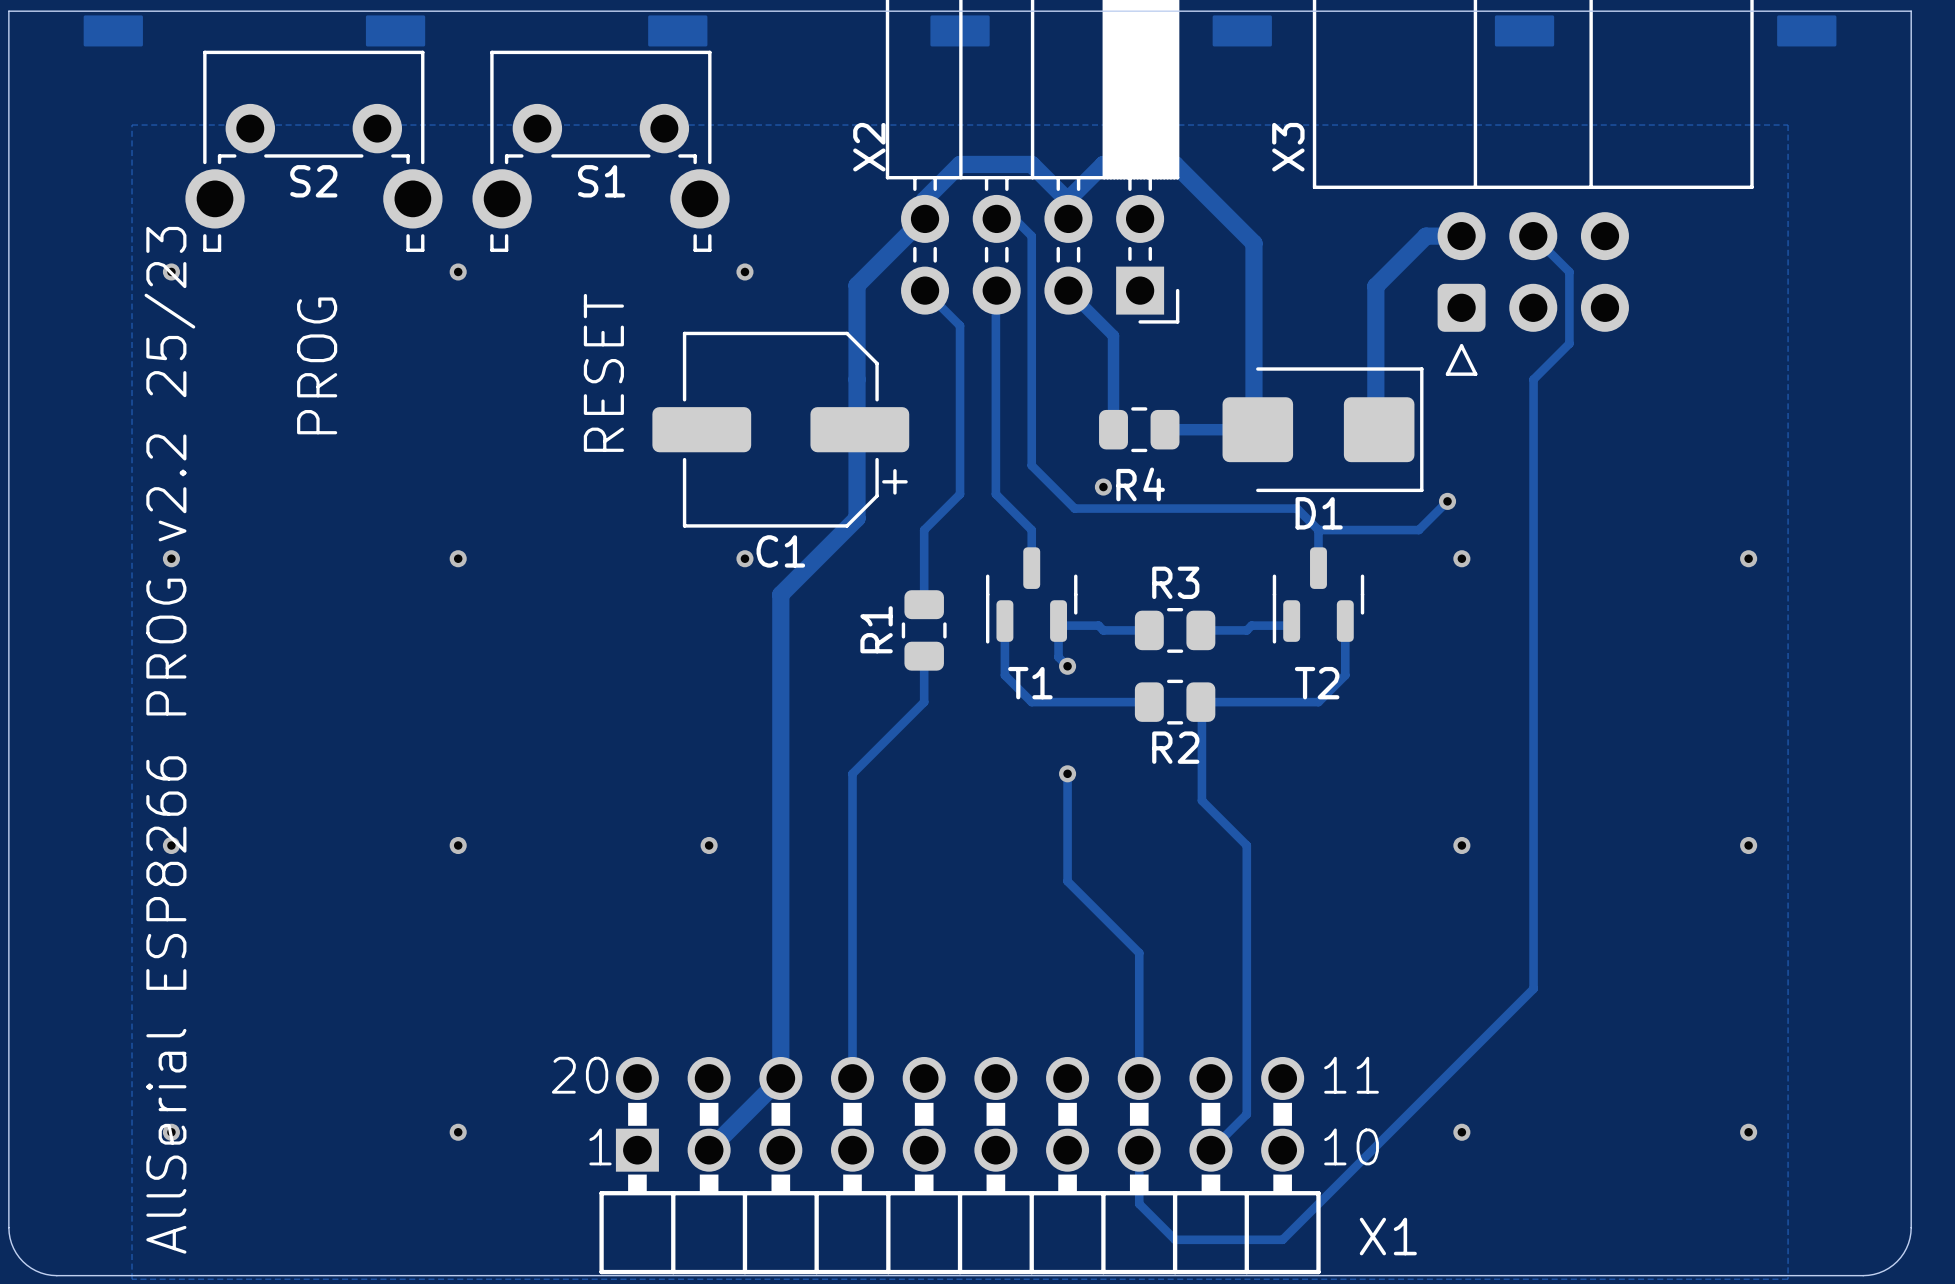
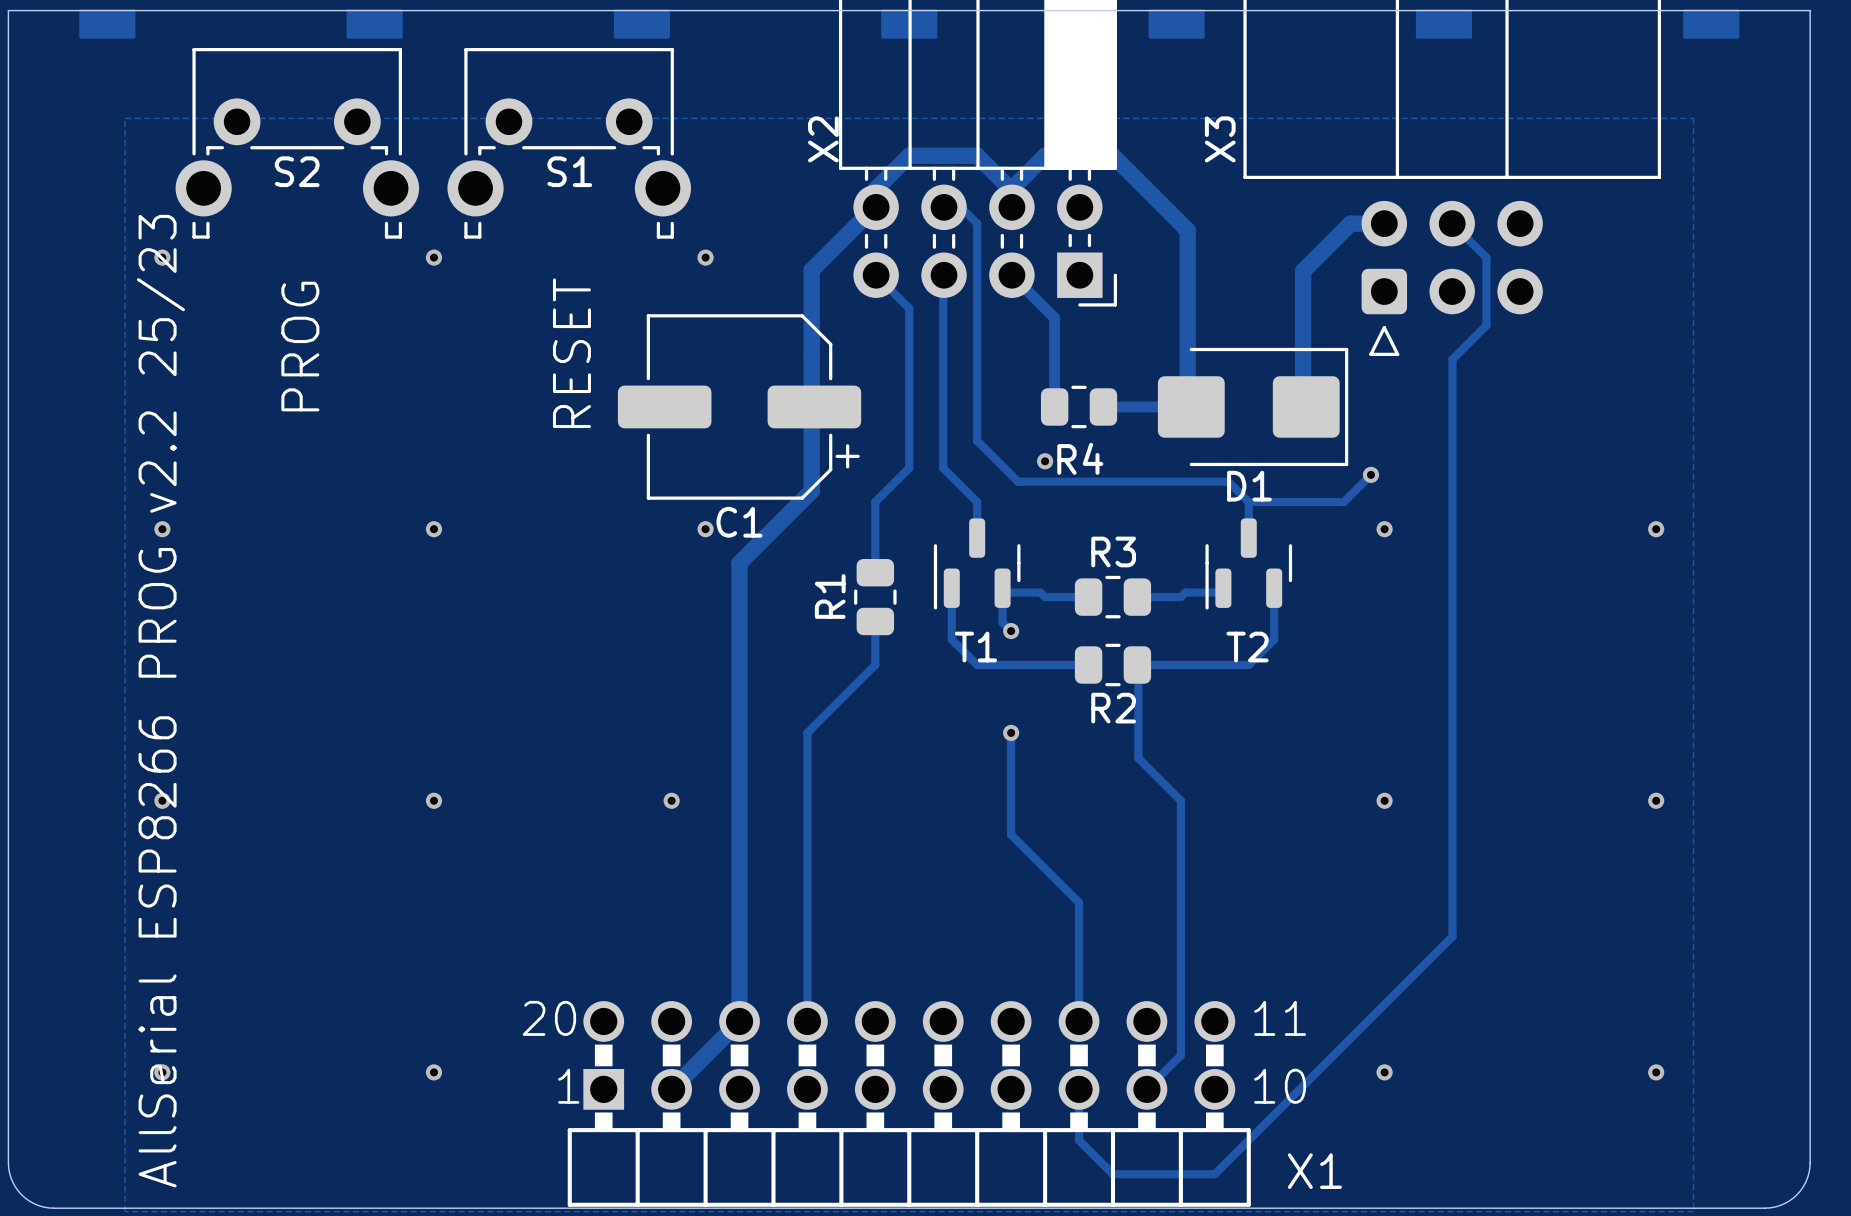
X1 footprint: [8, 10, 1912, 1277] -> [7, 9, 1811, 1209]

